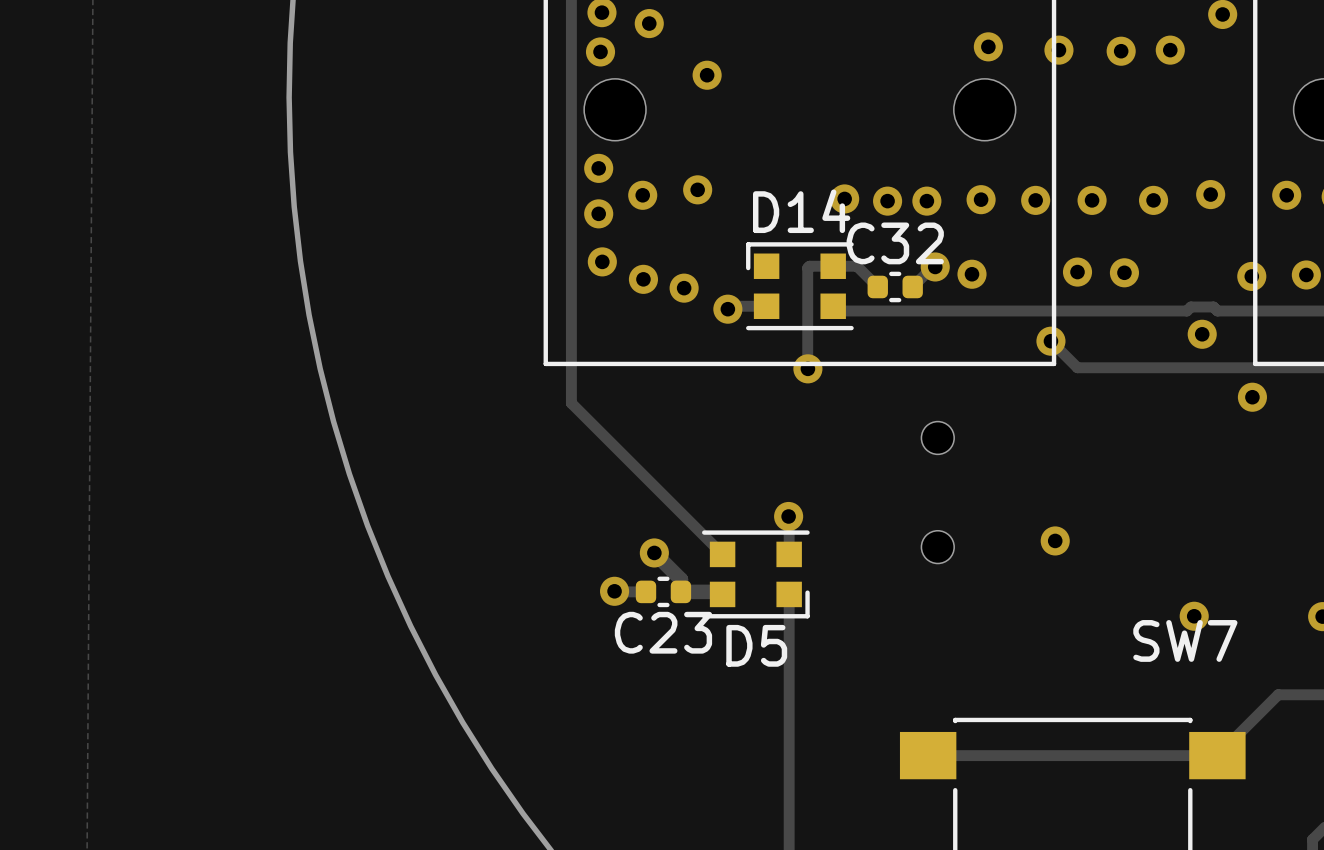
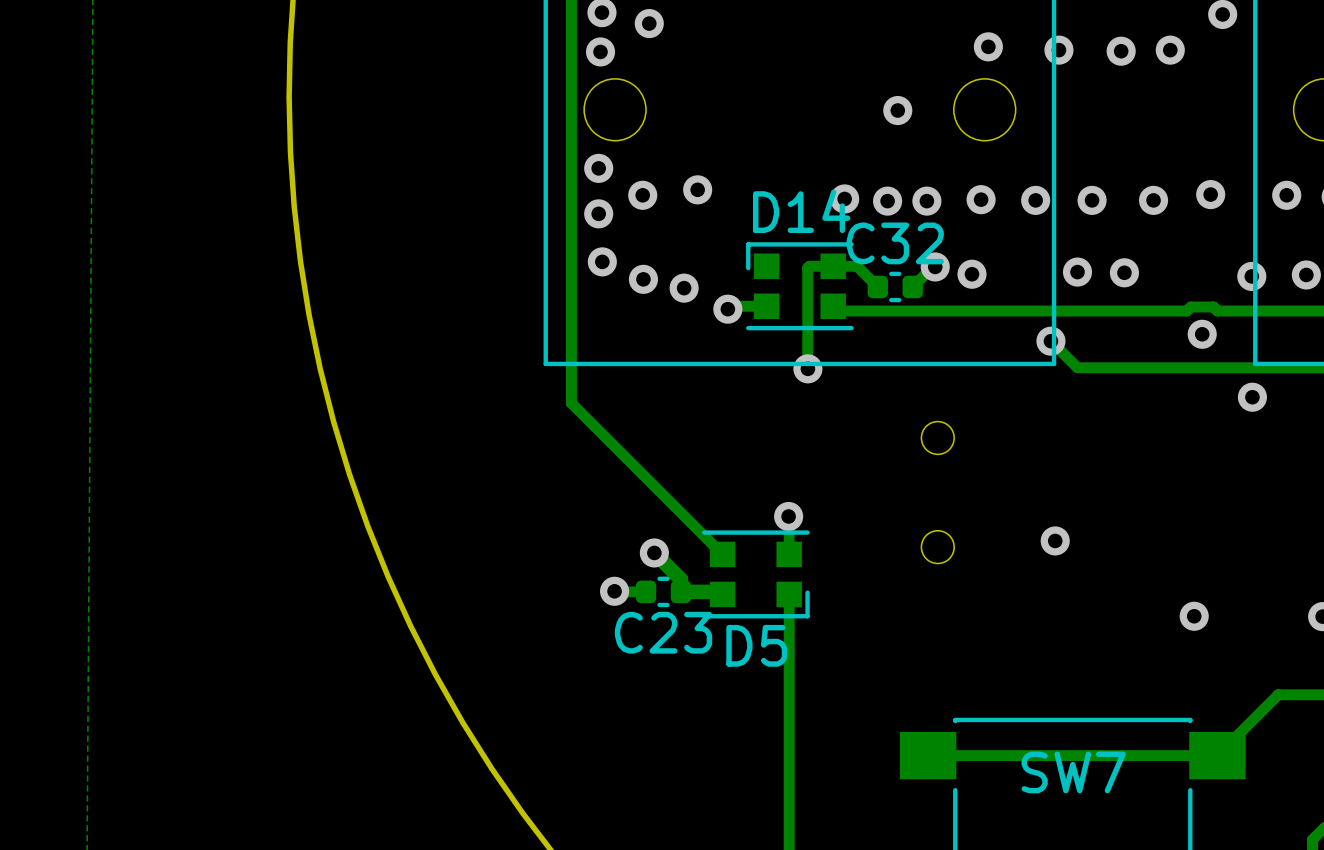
via position: (707, 75) -> (897, 110)
SW7 name position: SW7 (1185, 640) -> SW7 (1073, 772)

